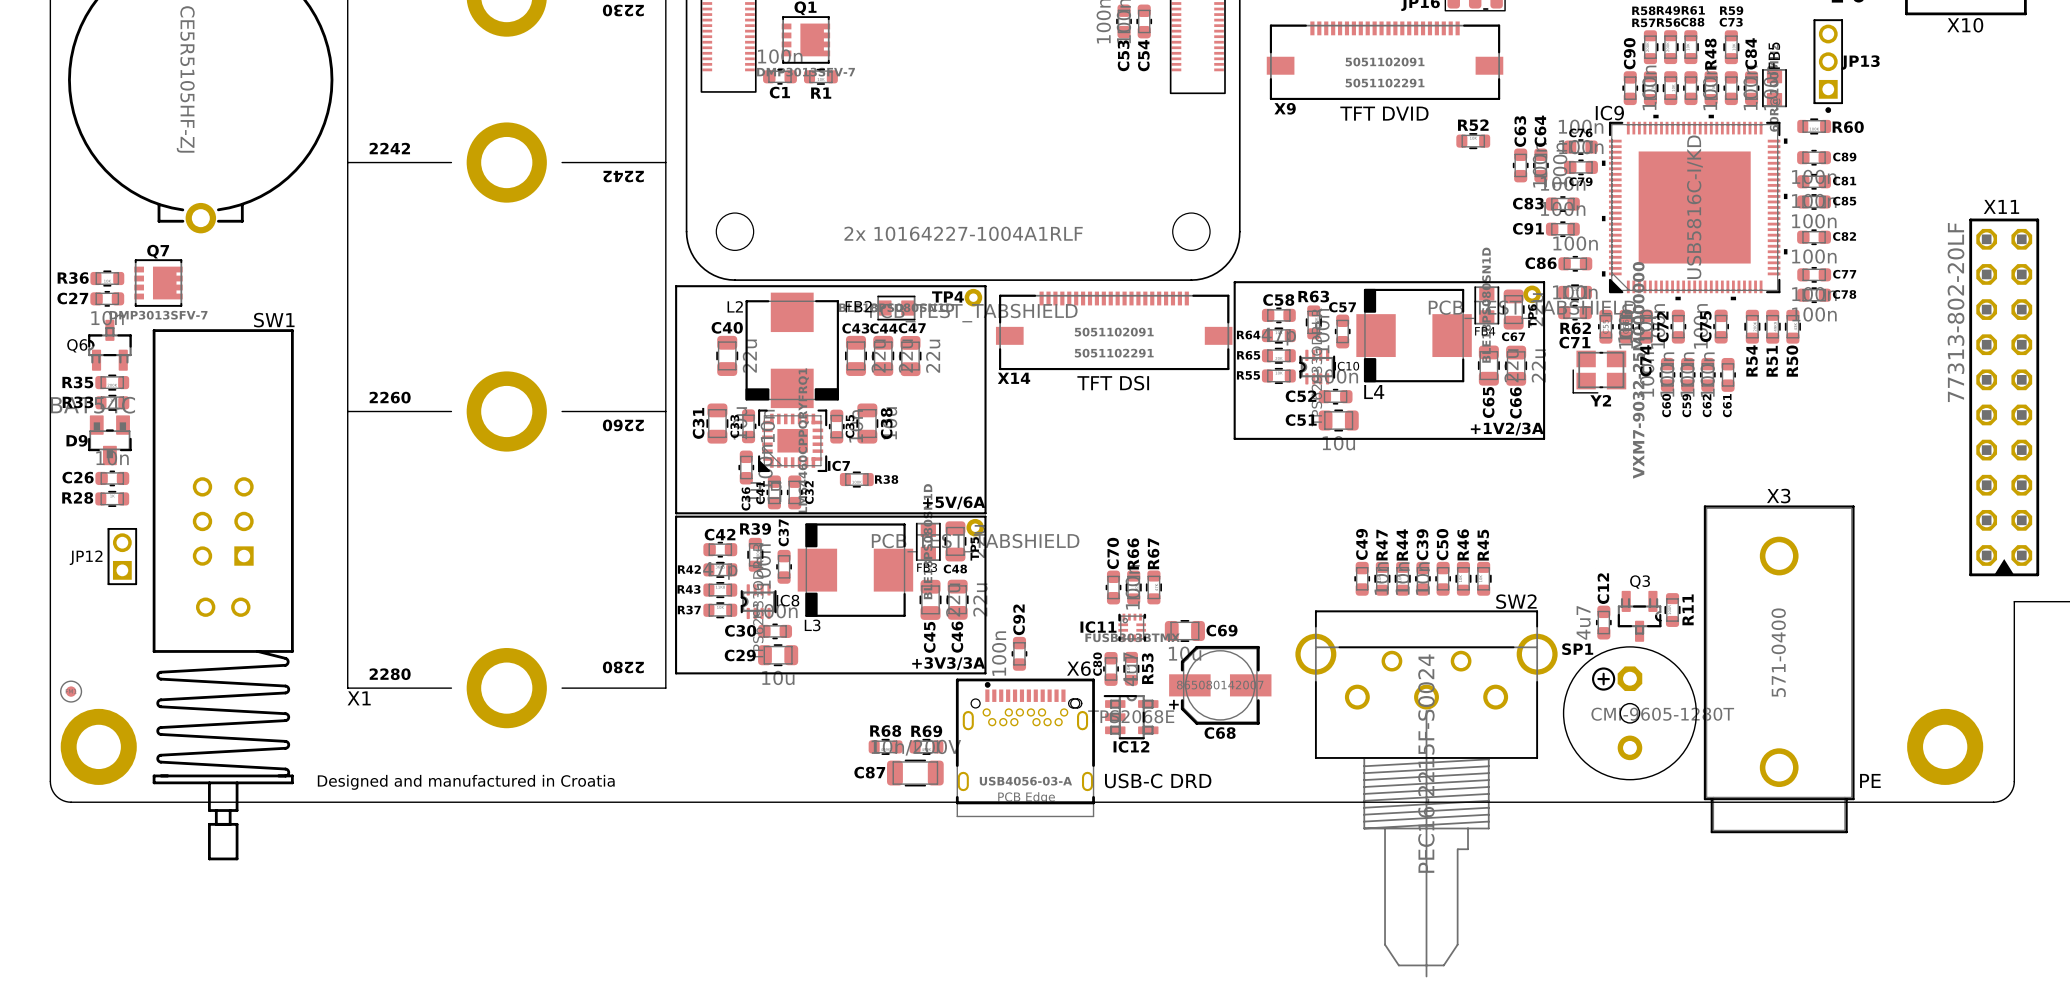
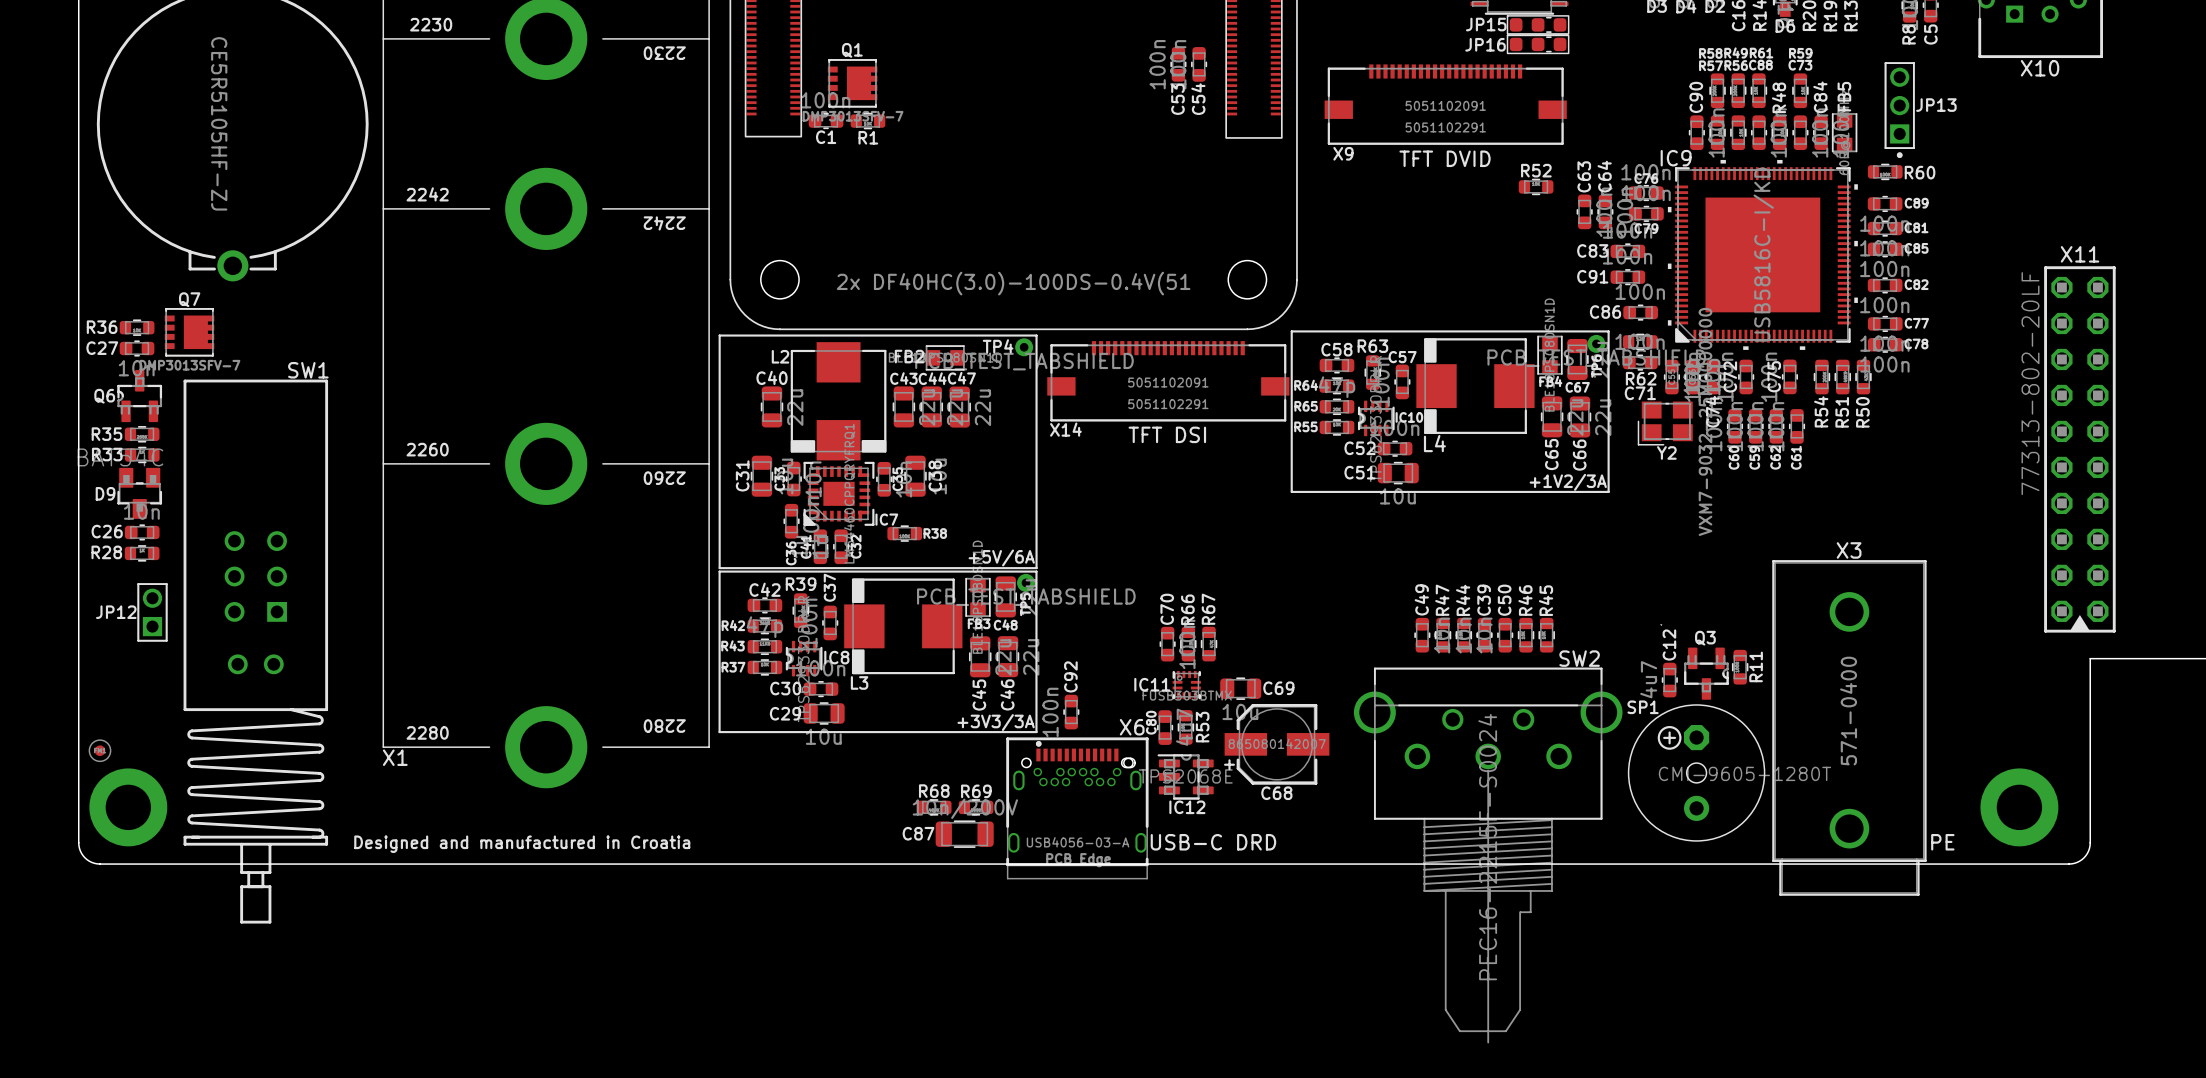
part value: 2x 10164227-1004A1RLF (963, 233) -> 2x DF40HC(3.0)-100DS-0.4V(51 (1013, 283)

